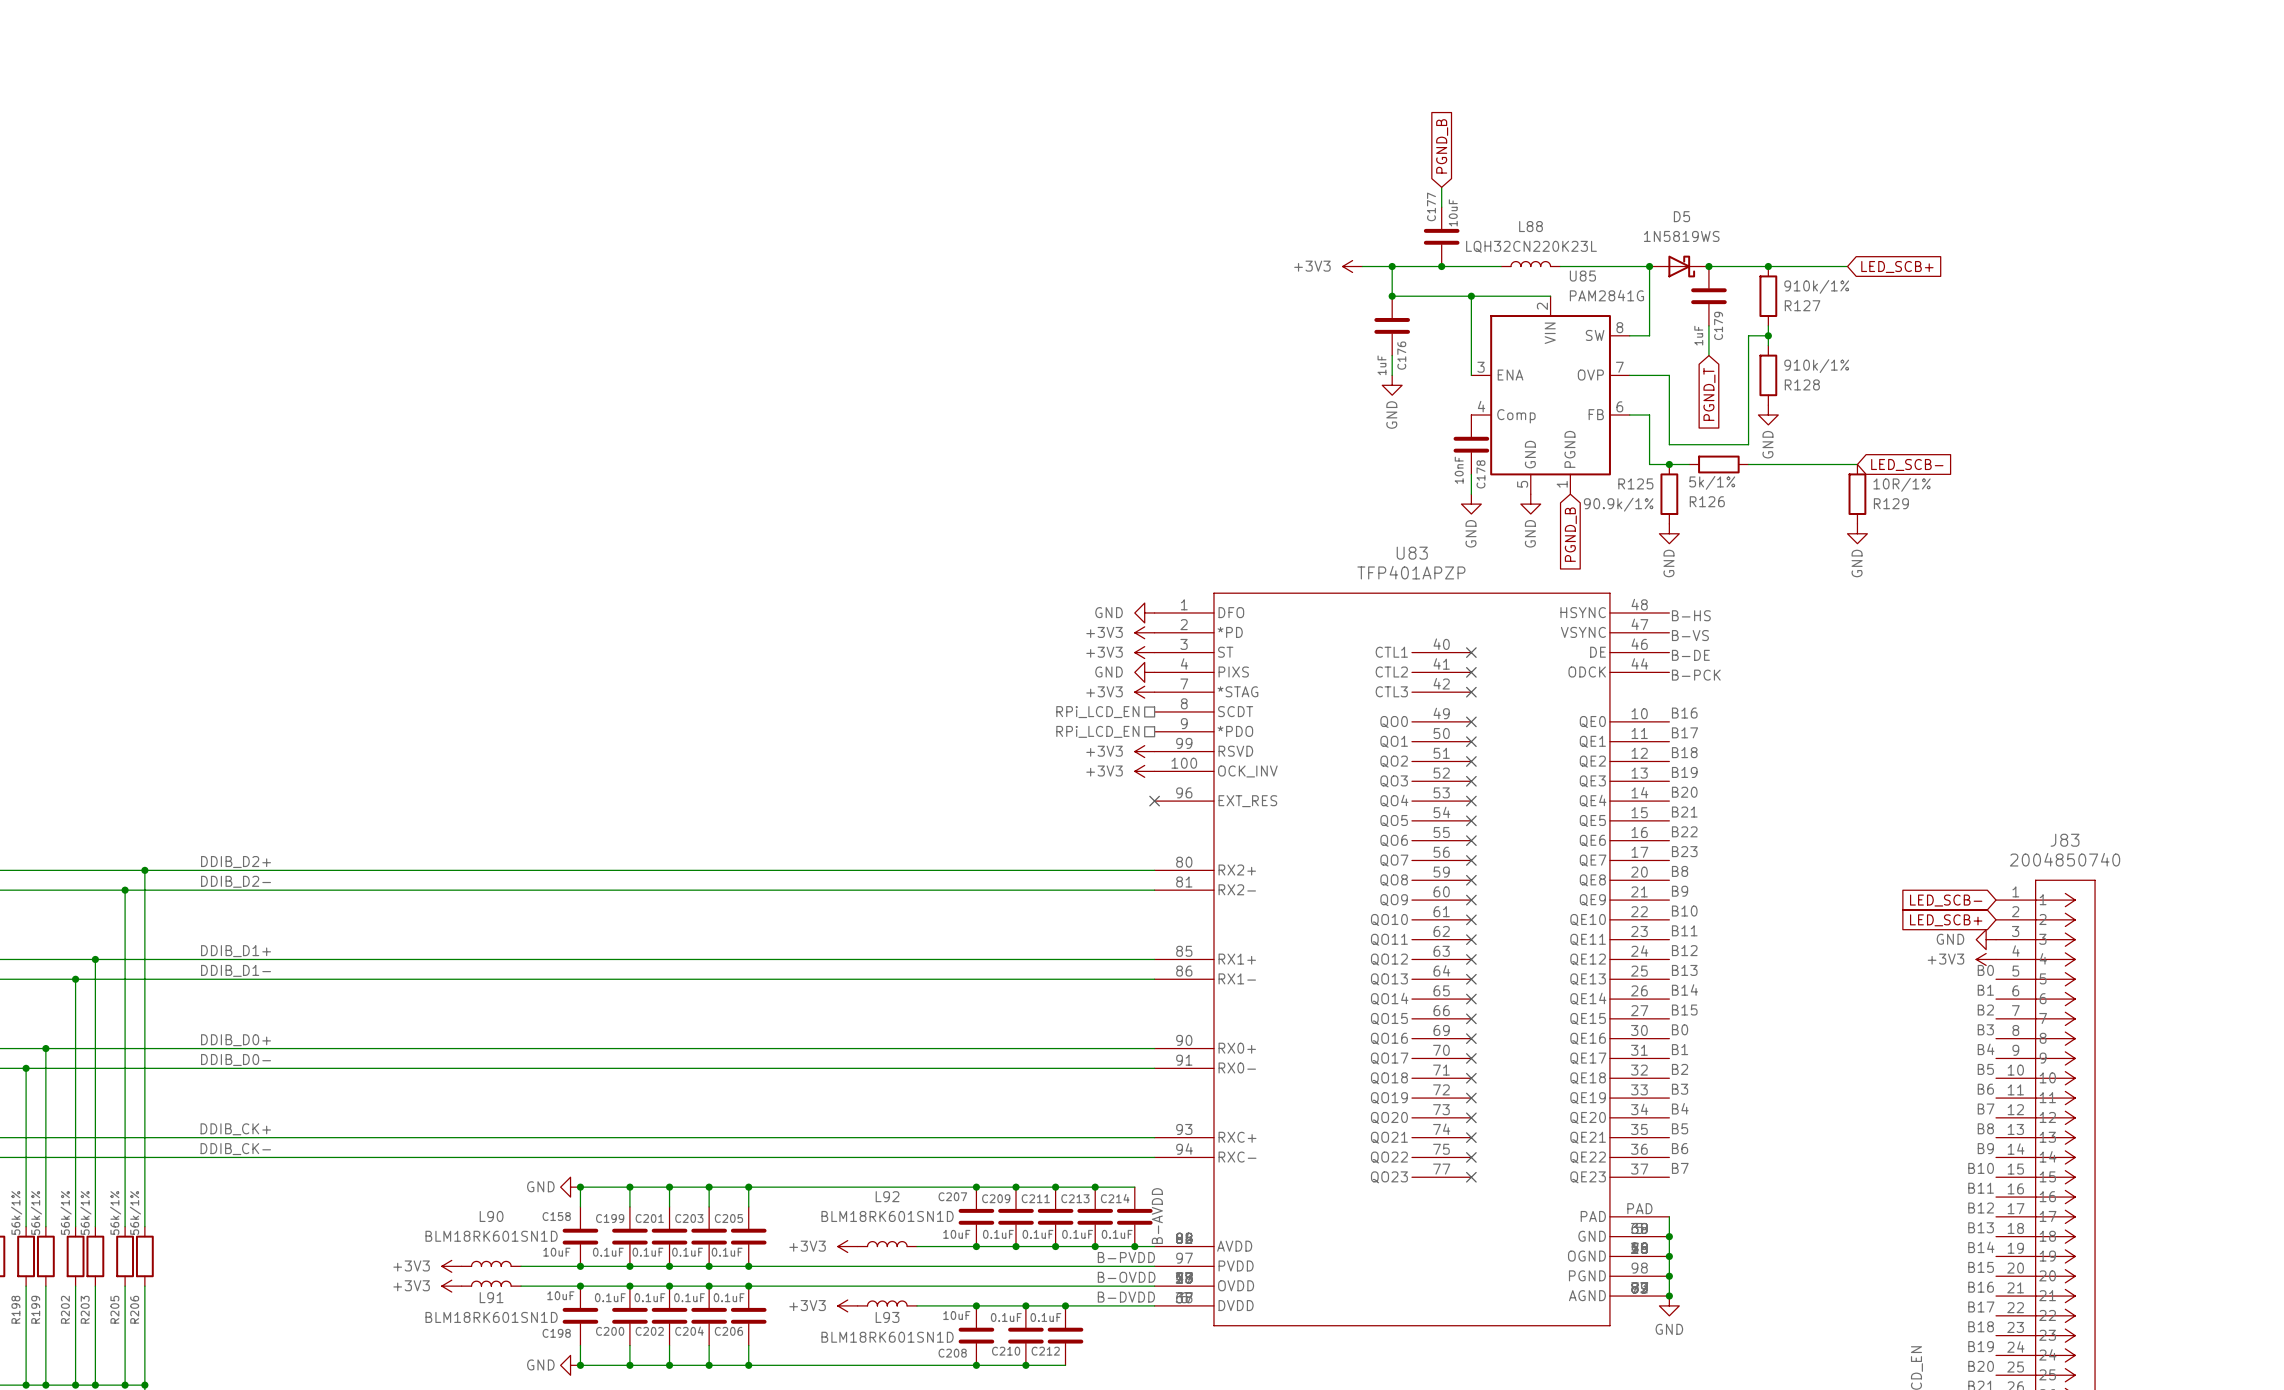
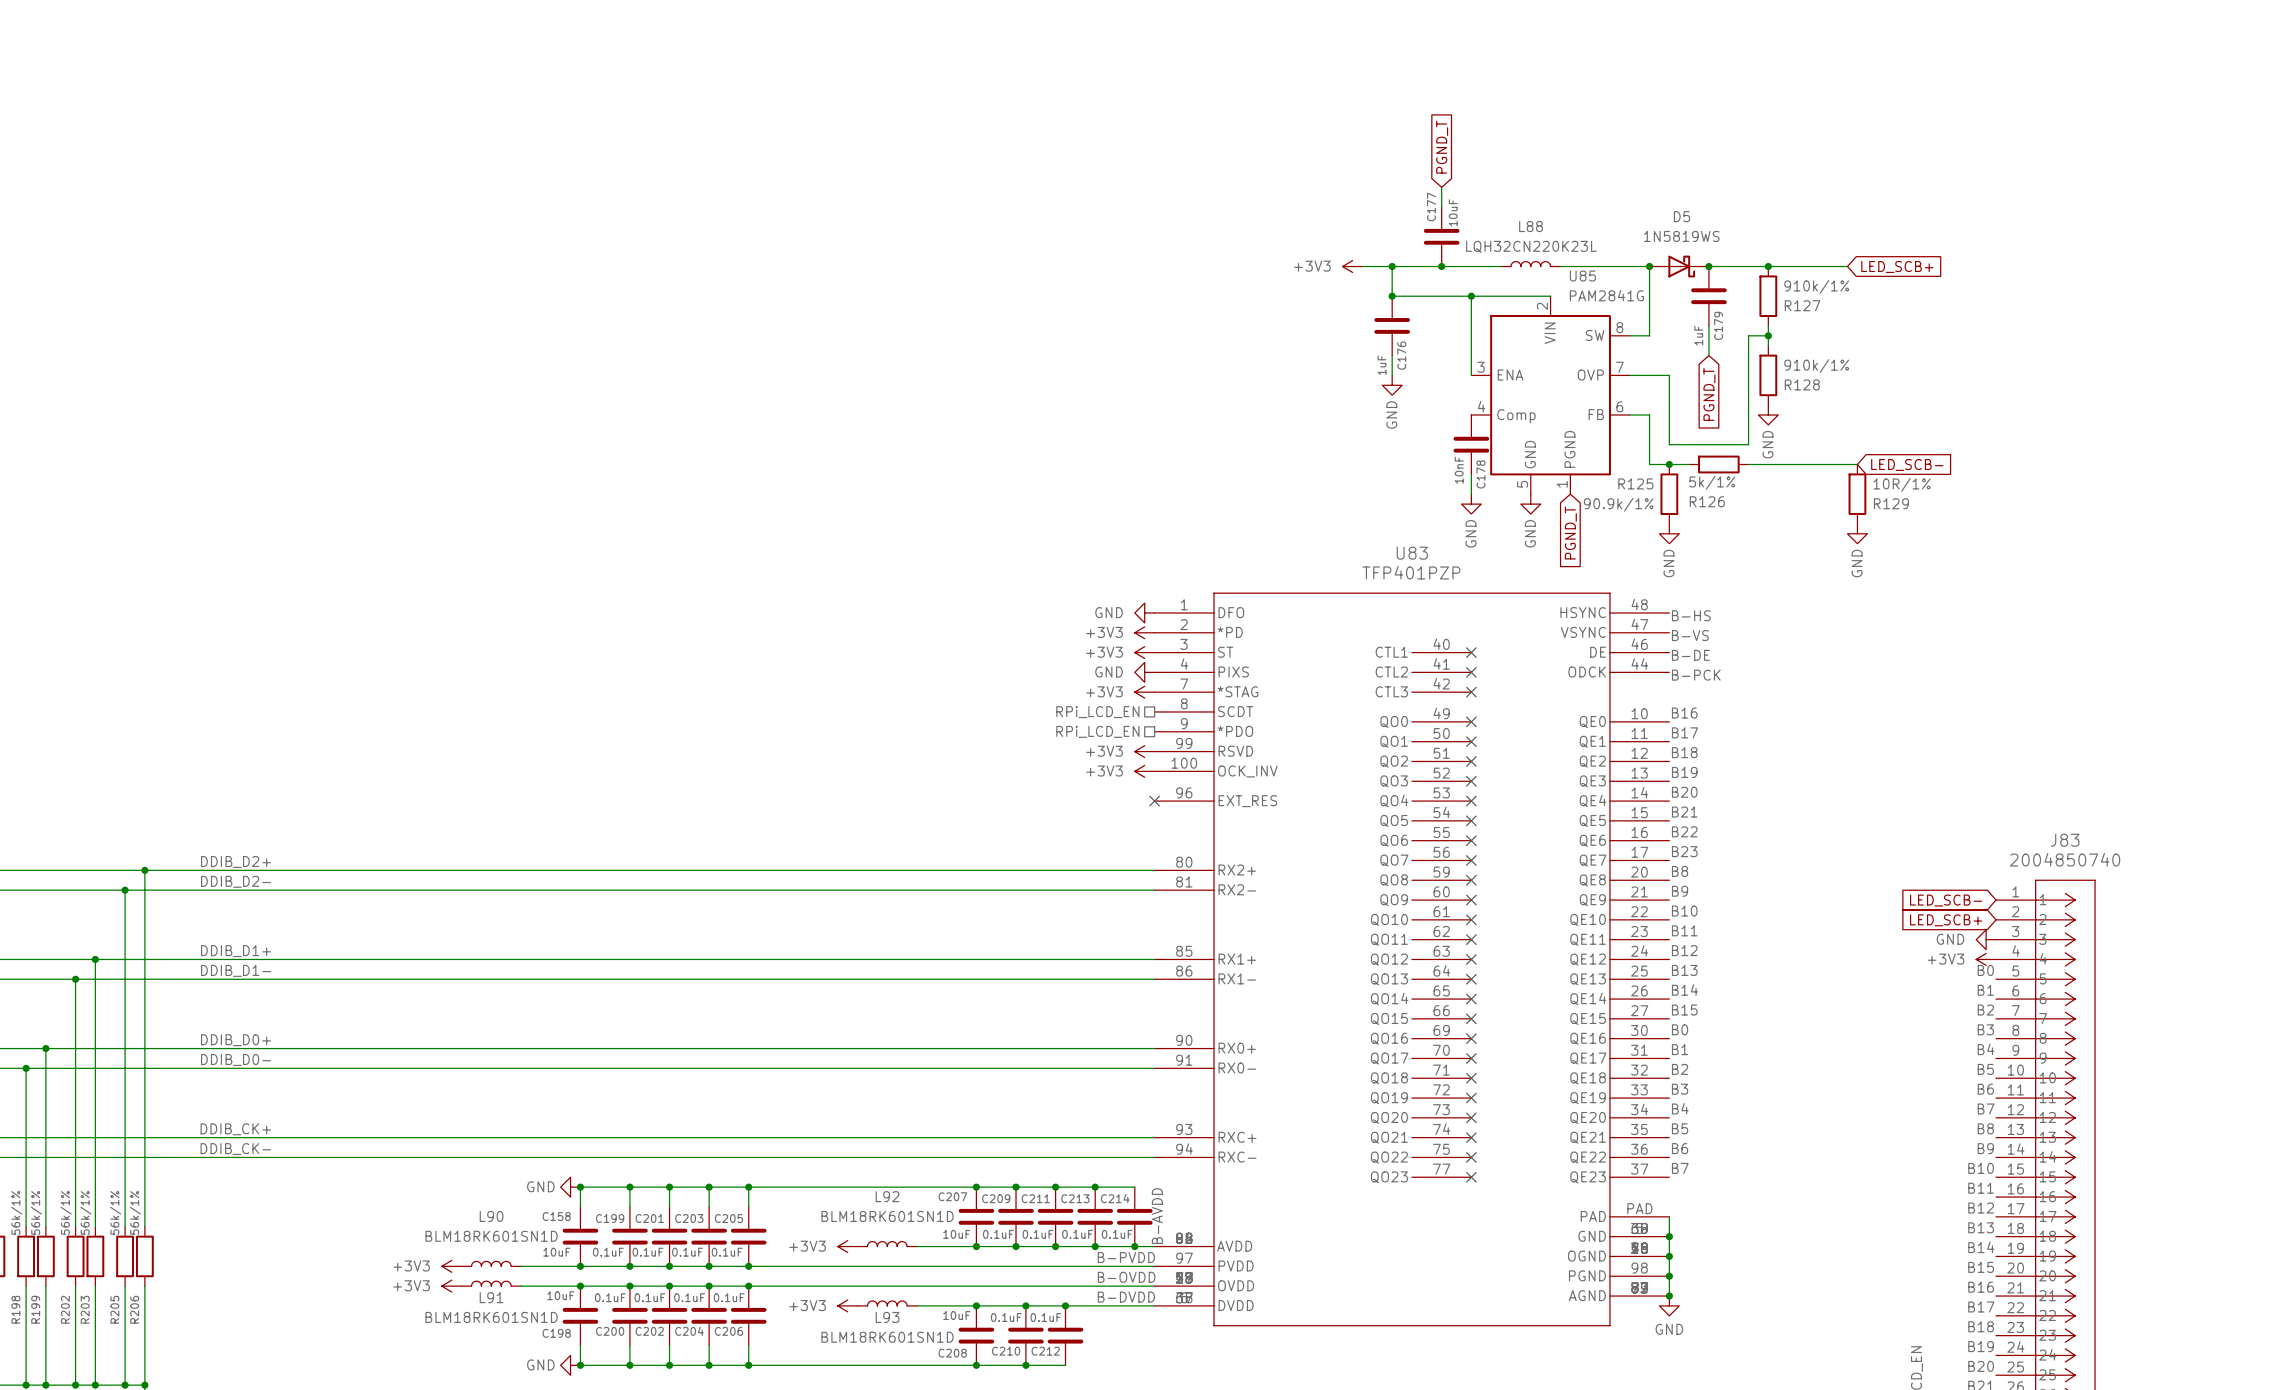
global label: PGND_B (1442, 146) -> PGND_T (1442, 147)
global label: PGND_B (1570, 534) -> PGND_T (1570, 532)
U83 value: TFP401APZP (1411, 572) -> TFP401PZP (1411, 572)

